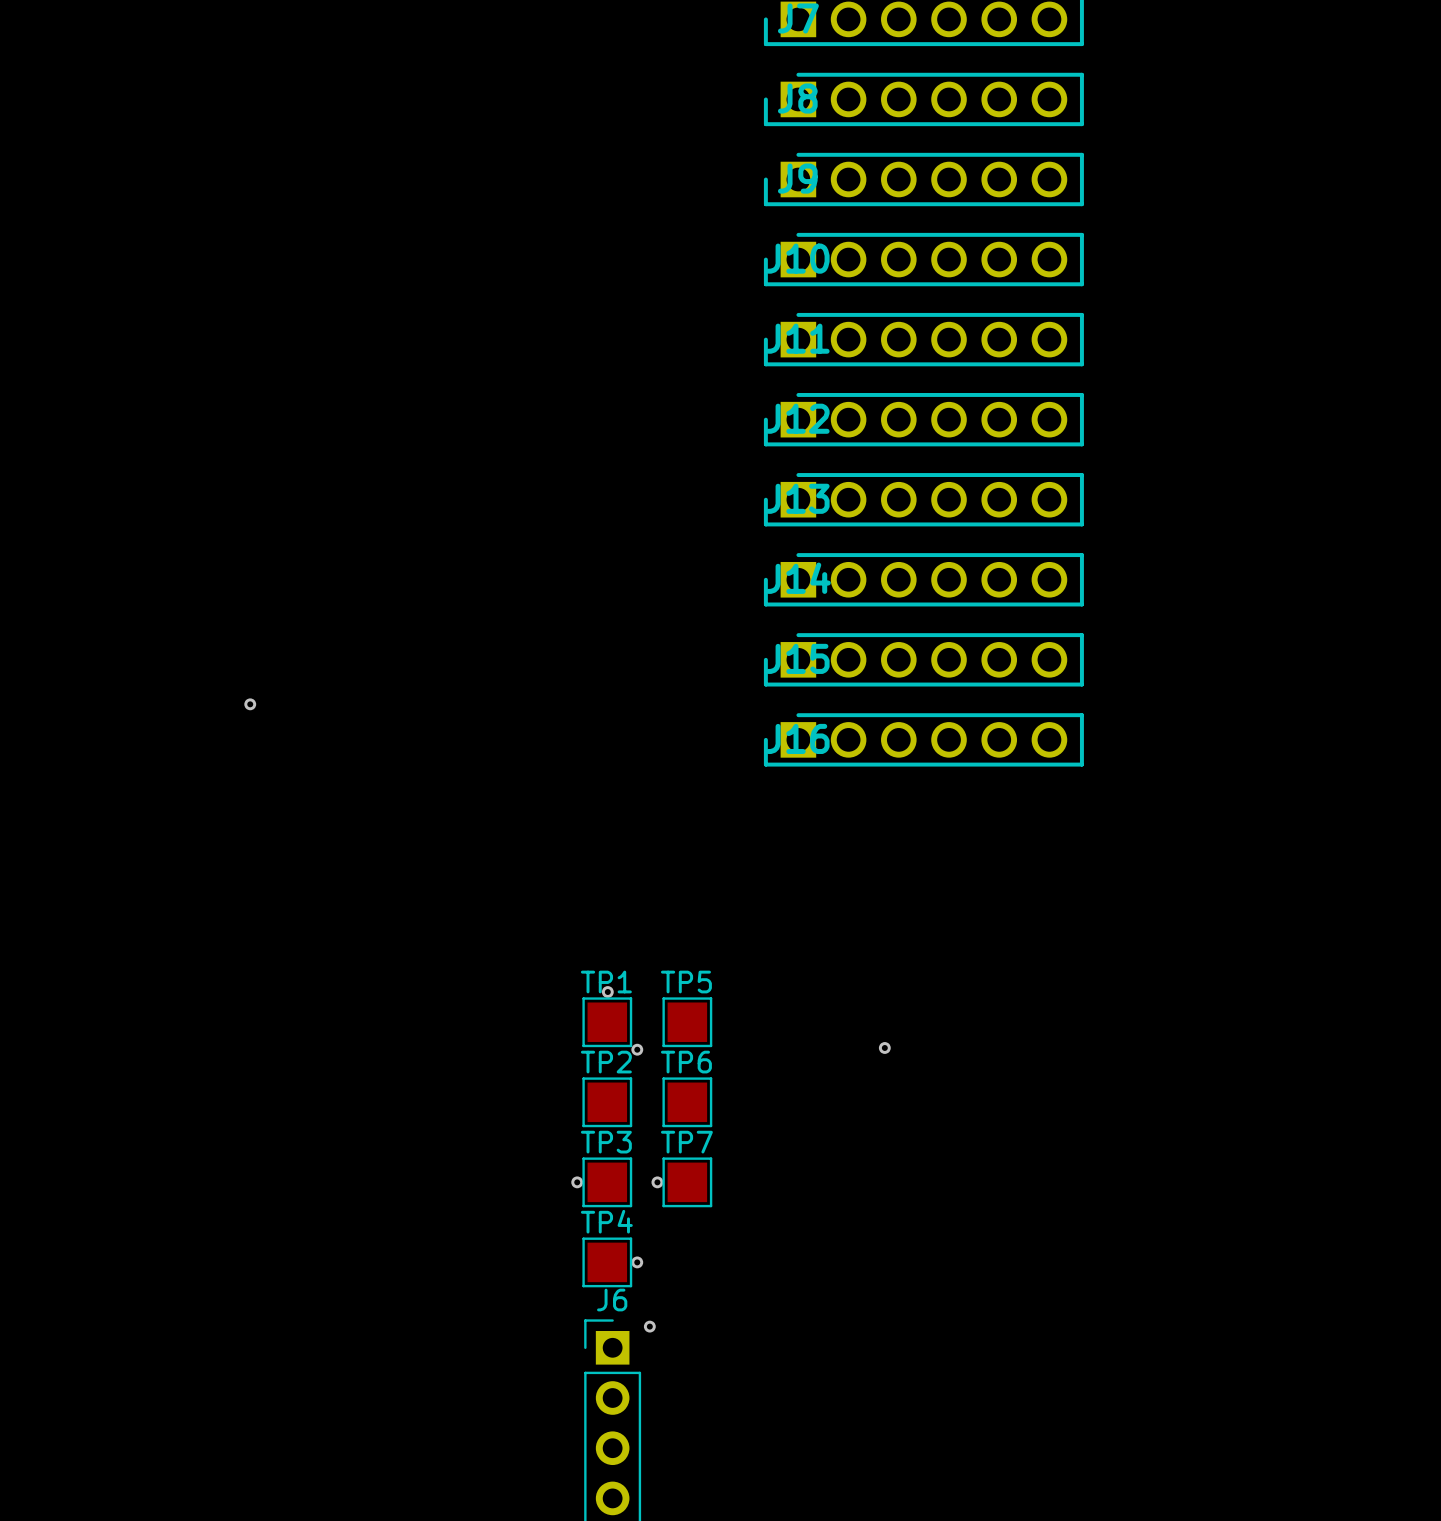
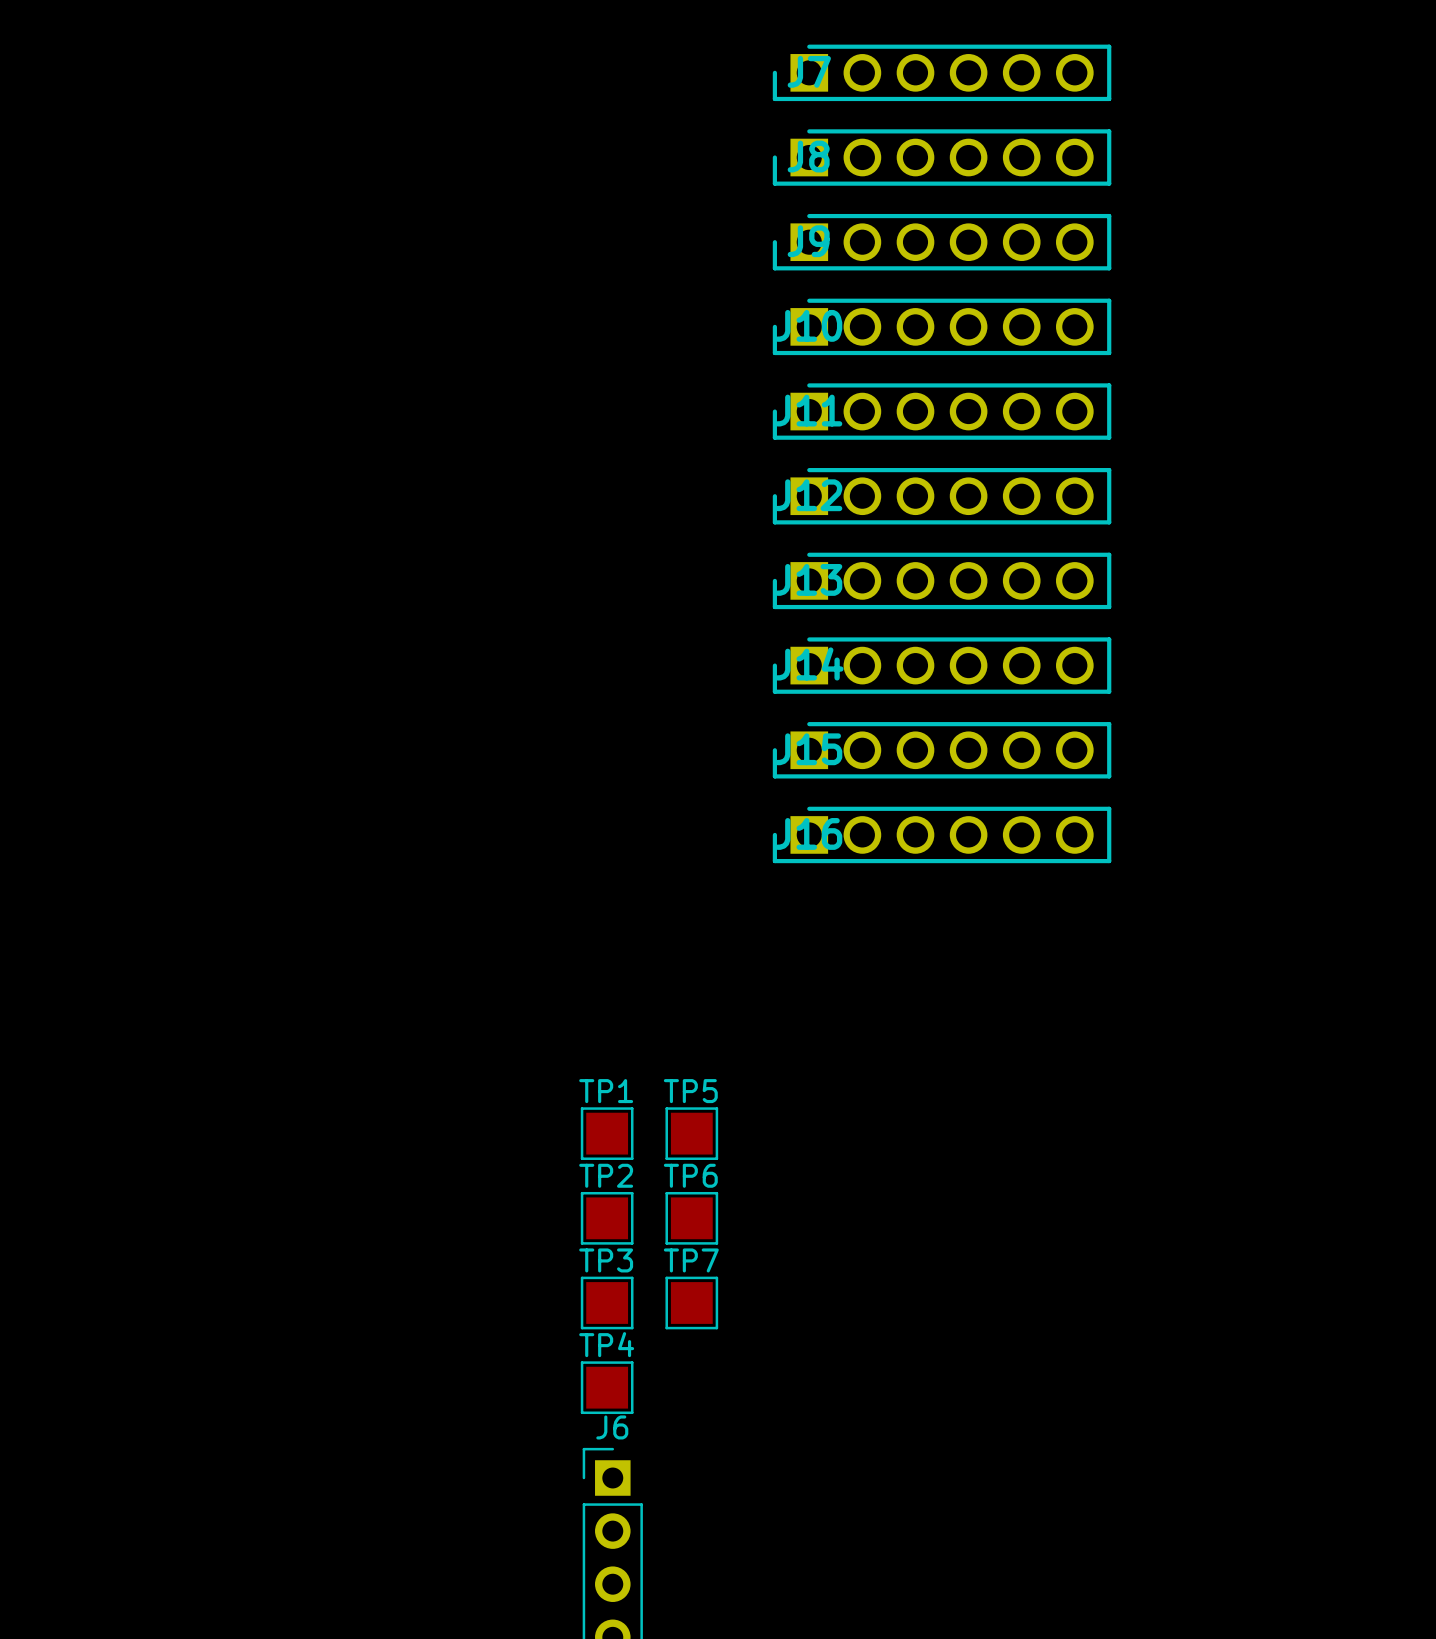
via: (250, 704) -> none
via: (607, 992) -> none
via: (884, 1047) -> none
via: (637, 1049) -> none
via: (577, 1182) -> none
via: (657, 1182) -> none
via: (637, 1262) -> none
via: (649, 1326) -> none

